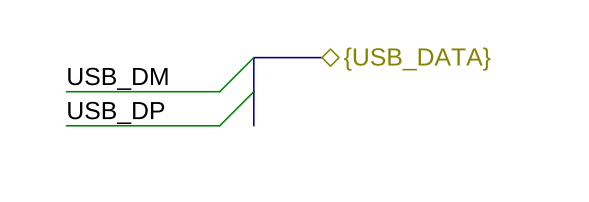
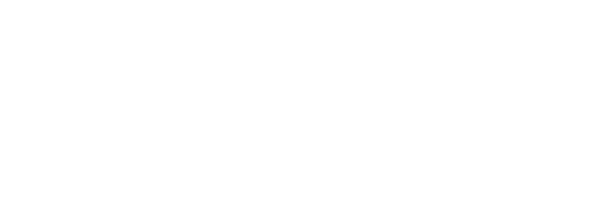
wire: (253, 57) (219, 91) (66, 91) -> none
bus: (321, 57) (253, 57) (253, 125) -> none
hierarchical label: {USB_DATA} (417, 59) -> none
label: USB_DM (117, 78) -> none
wire: (253, 91) (219, 125) (66, 125) -> none
label: USB_DP (116, 112) -> none

